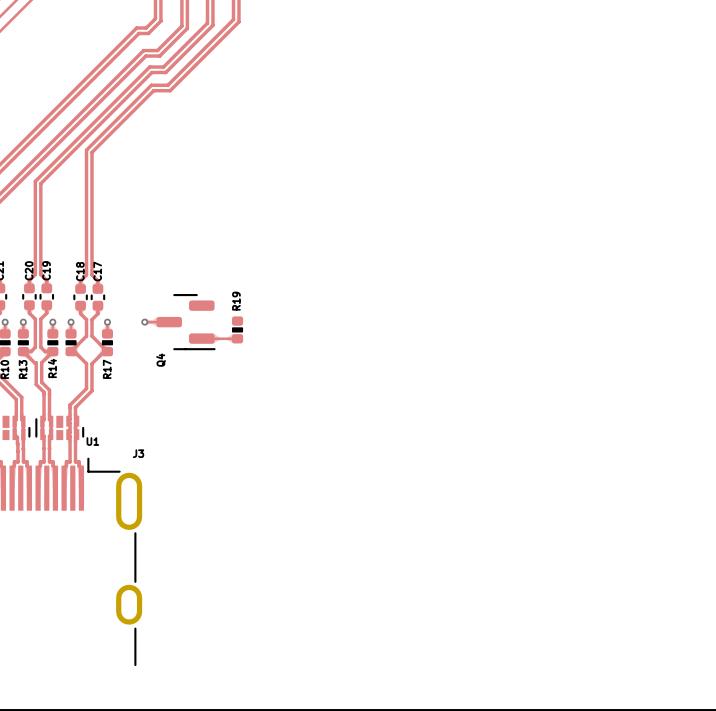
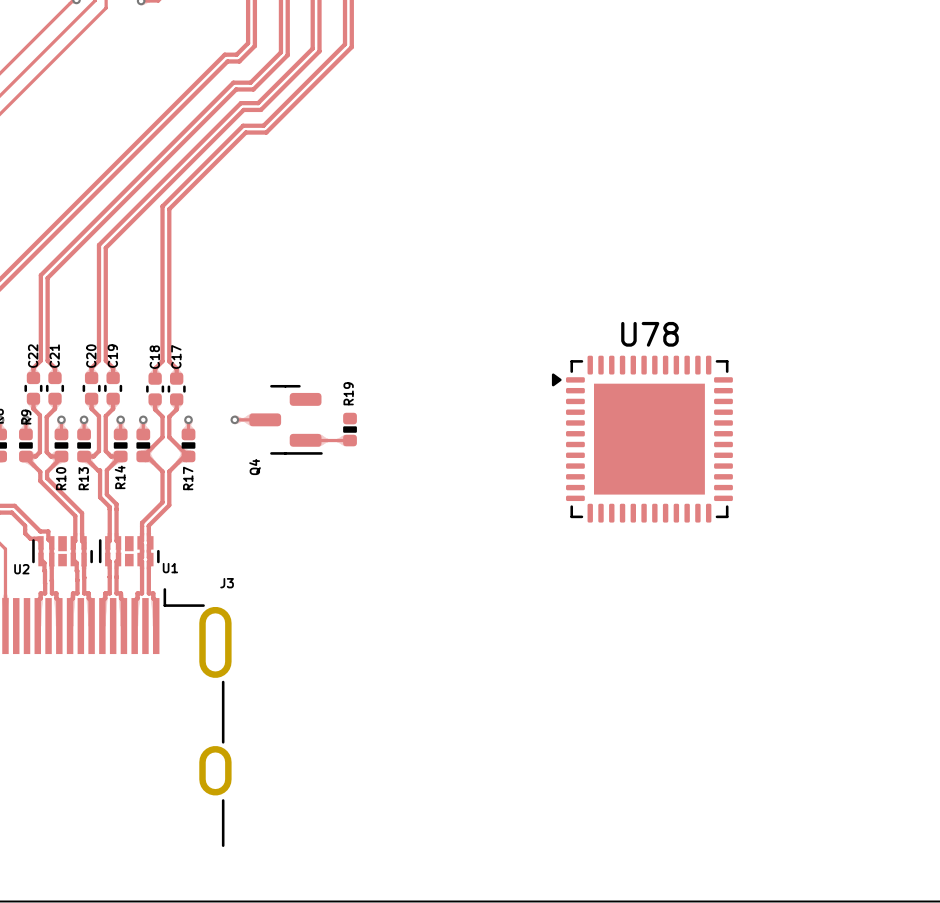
U78: none -> (642, 439)

